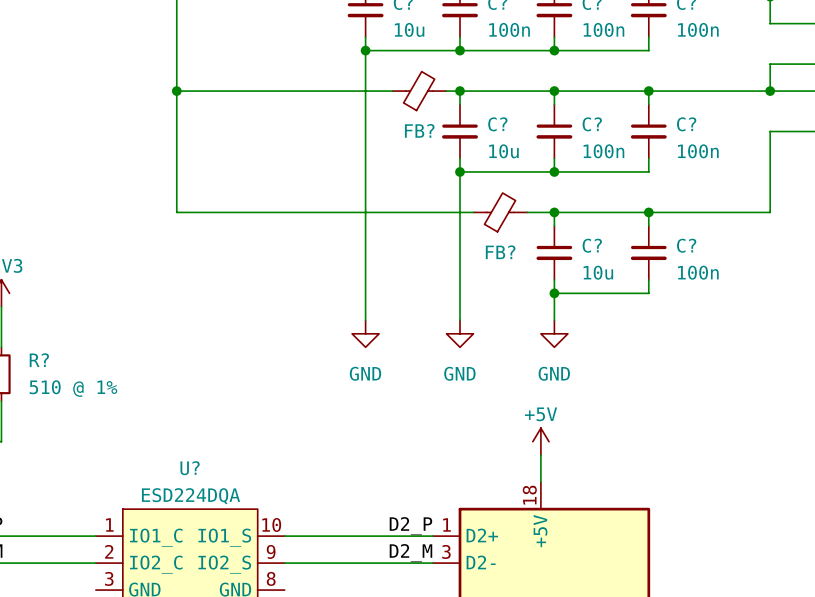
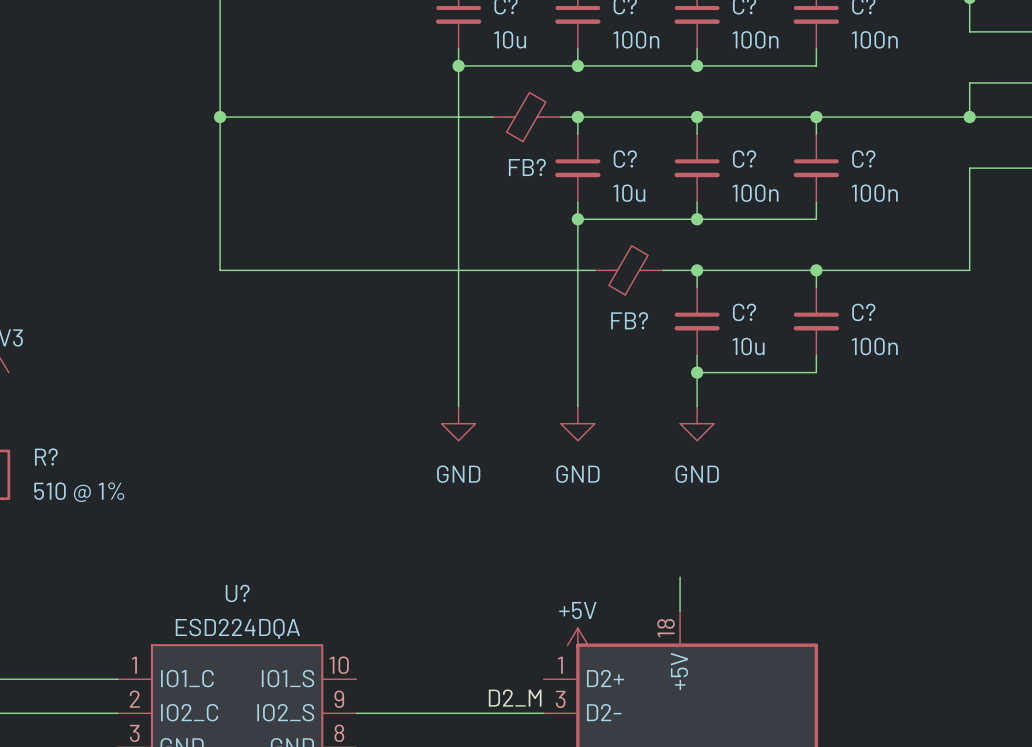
power symbol position: +5V (540, 441) -> +5V (577, 645)
label: D2_P (410, 526) -> none
wire: (284, 536) (433, 536) -> none

